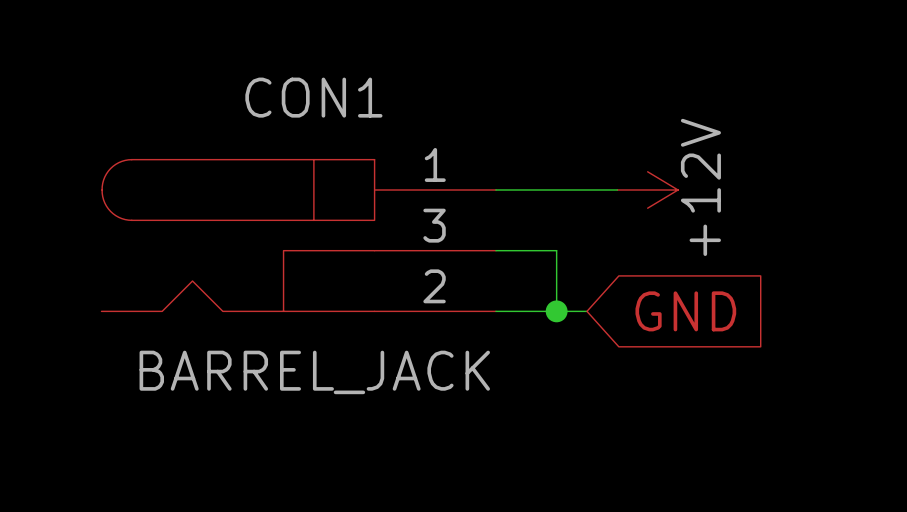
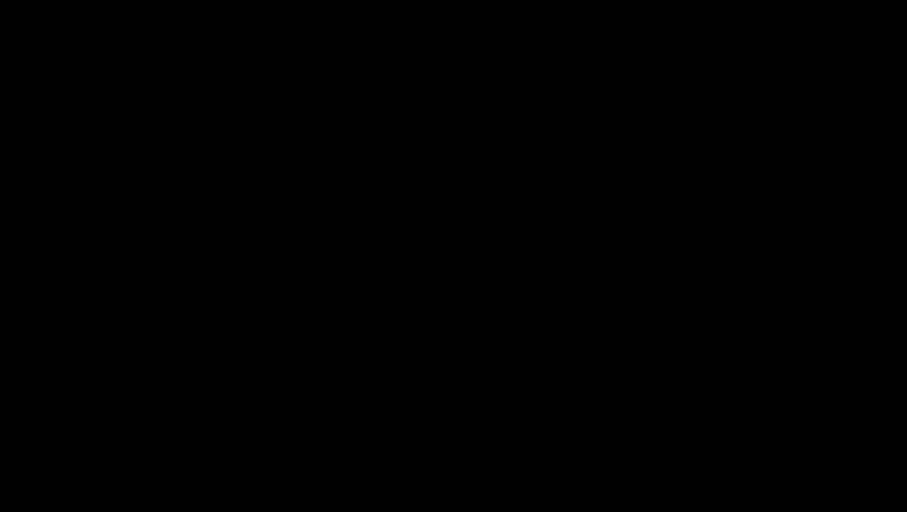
wire: (495, 189) (617, 189) -> none
power symbol: +12V (647, 189) -> none
CON1: BARREL_JACK (298, 235) -> none
wire: (495, 250) (556, 250) (556, 311) -> none
wire: (495, 311) (586, 311) -> none
junction: (556, 311) -> none
global label: GND (685, 311) -> none

